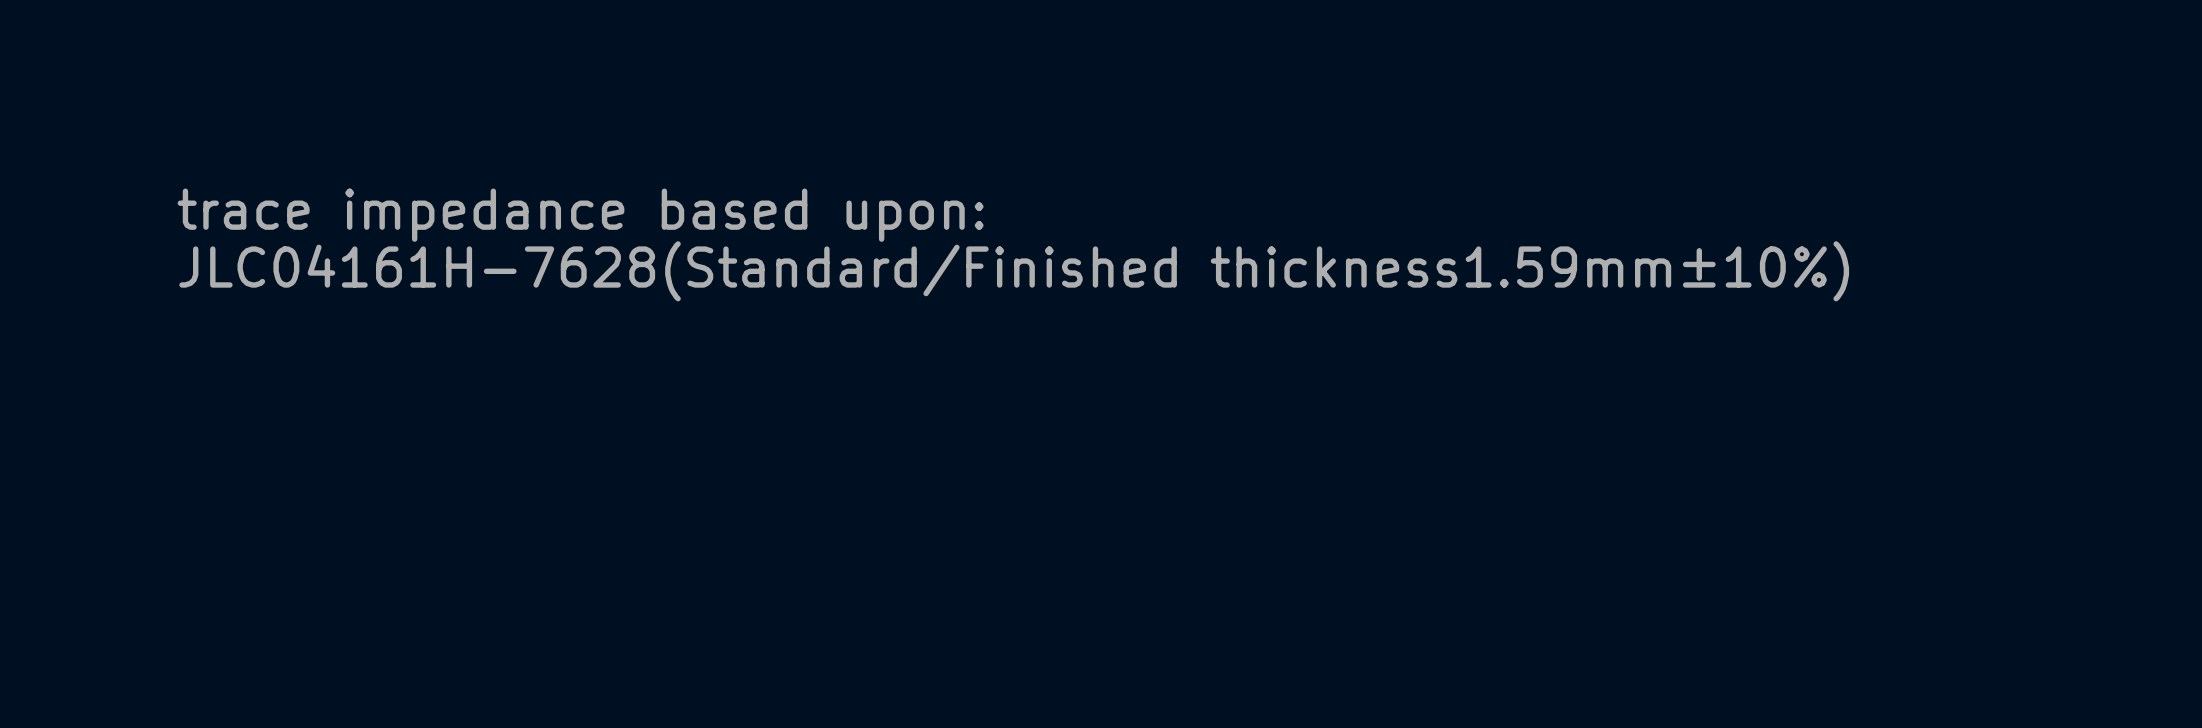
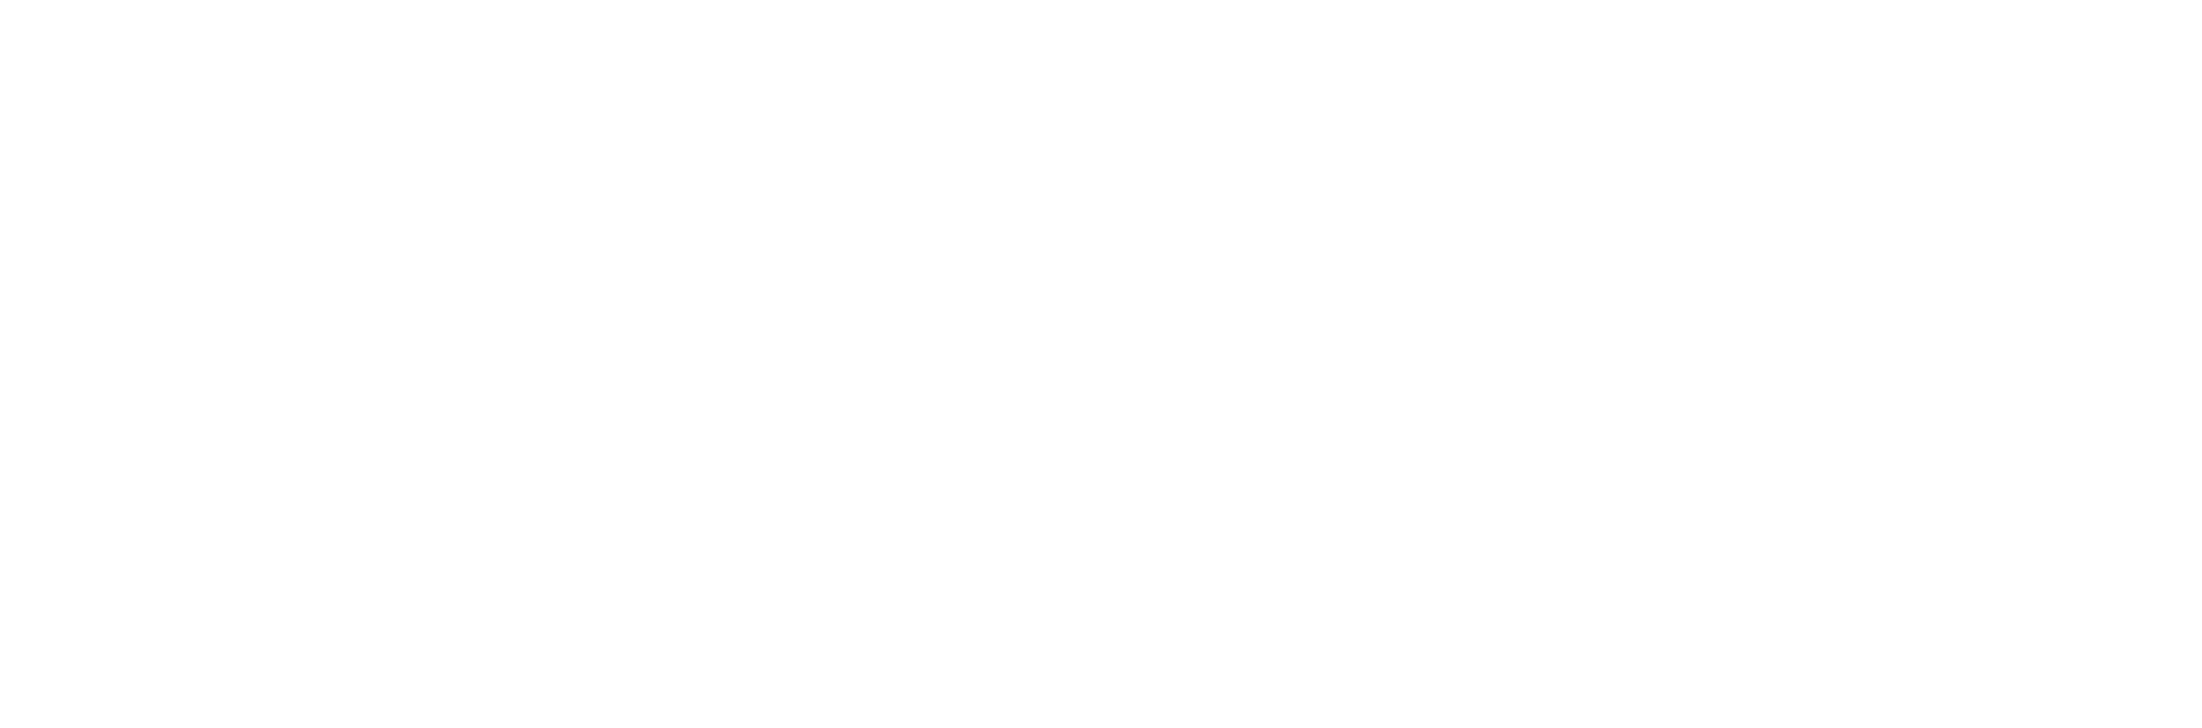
text: trace impedance based upon: (580, 215) -> none
text: JLC04161H-7628(Standard/Finished thickness1.59mm±10%) (1014, 271) -> none

